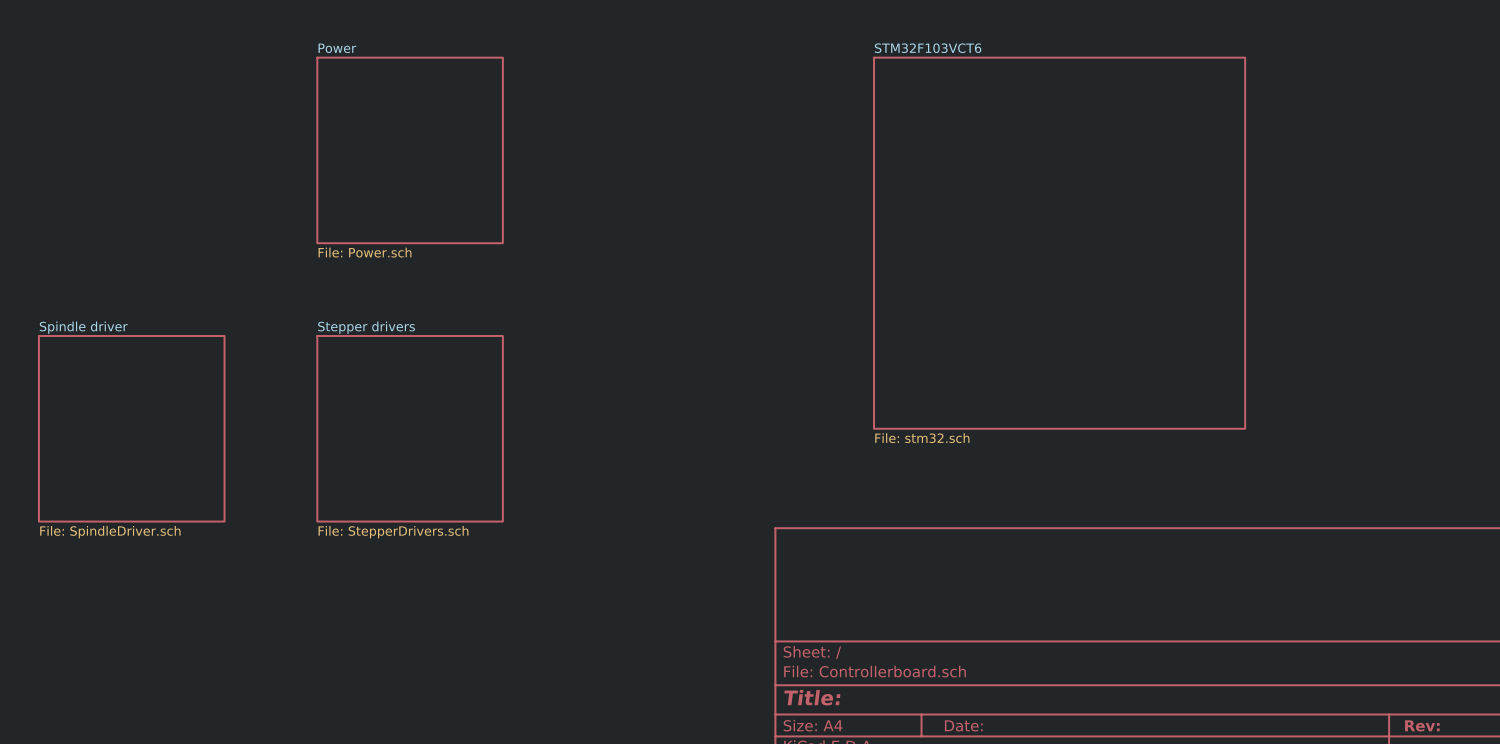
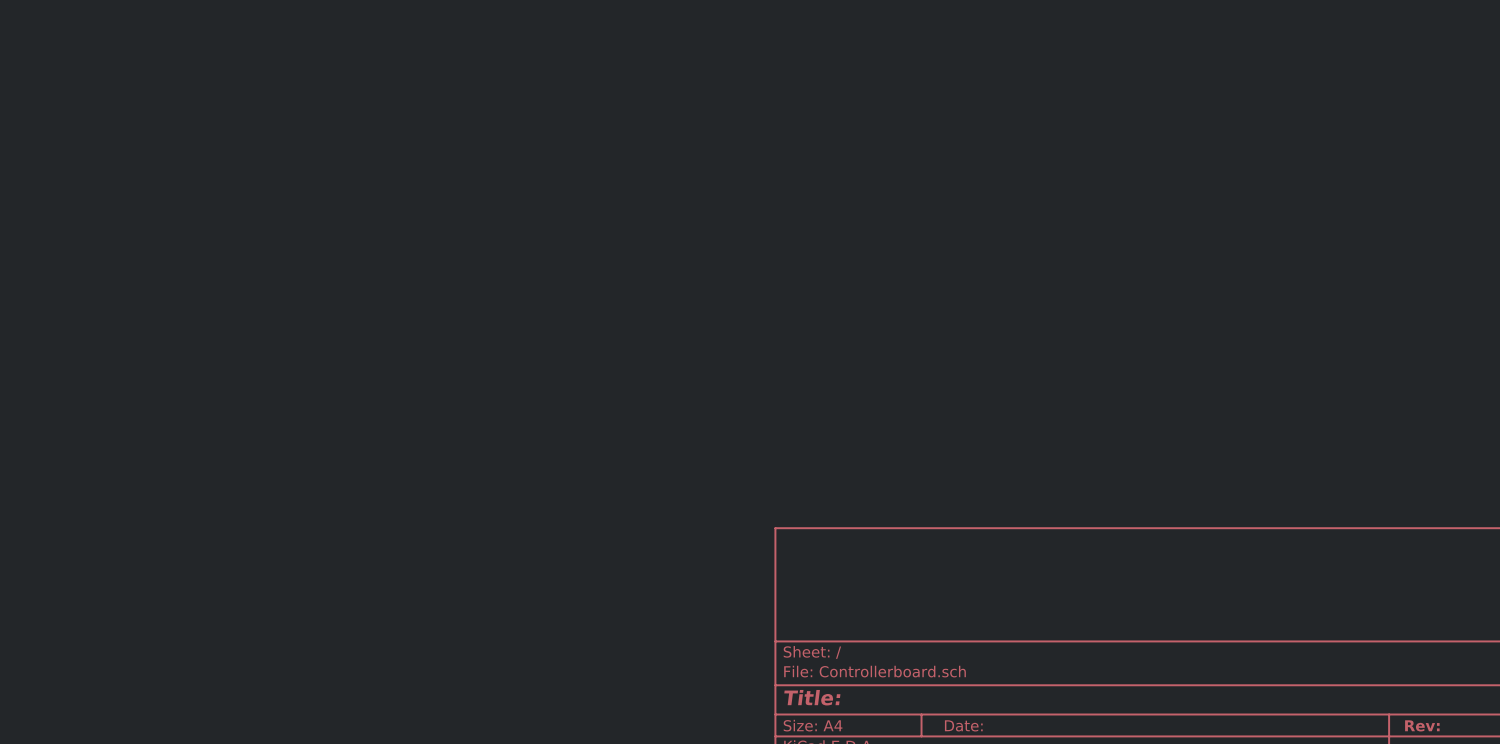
sheet Power: File: Power.sch (410, 150) -> none
sheet STM32F103VCT6: File: stm32.sch (1059, 243) -> none
sheet Spindle driver: File: SpindleDriver.sch (131, 428) -> none
sheet Stepper drivers: File: StepperDrivers.sch (410, 428) -> none

